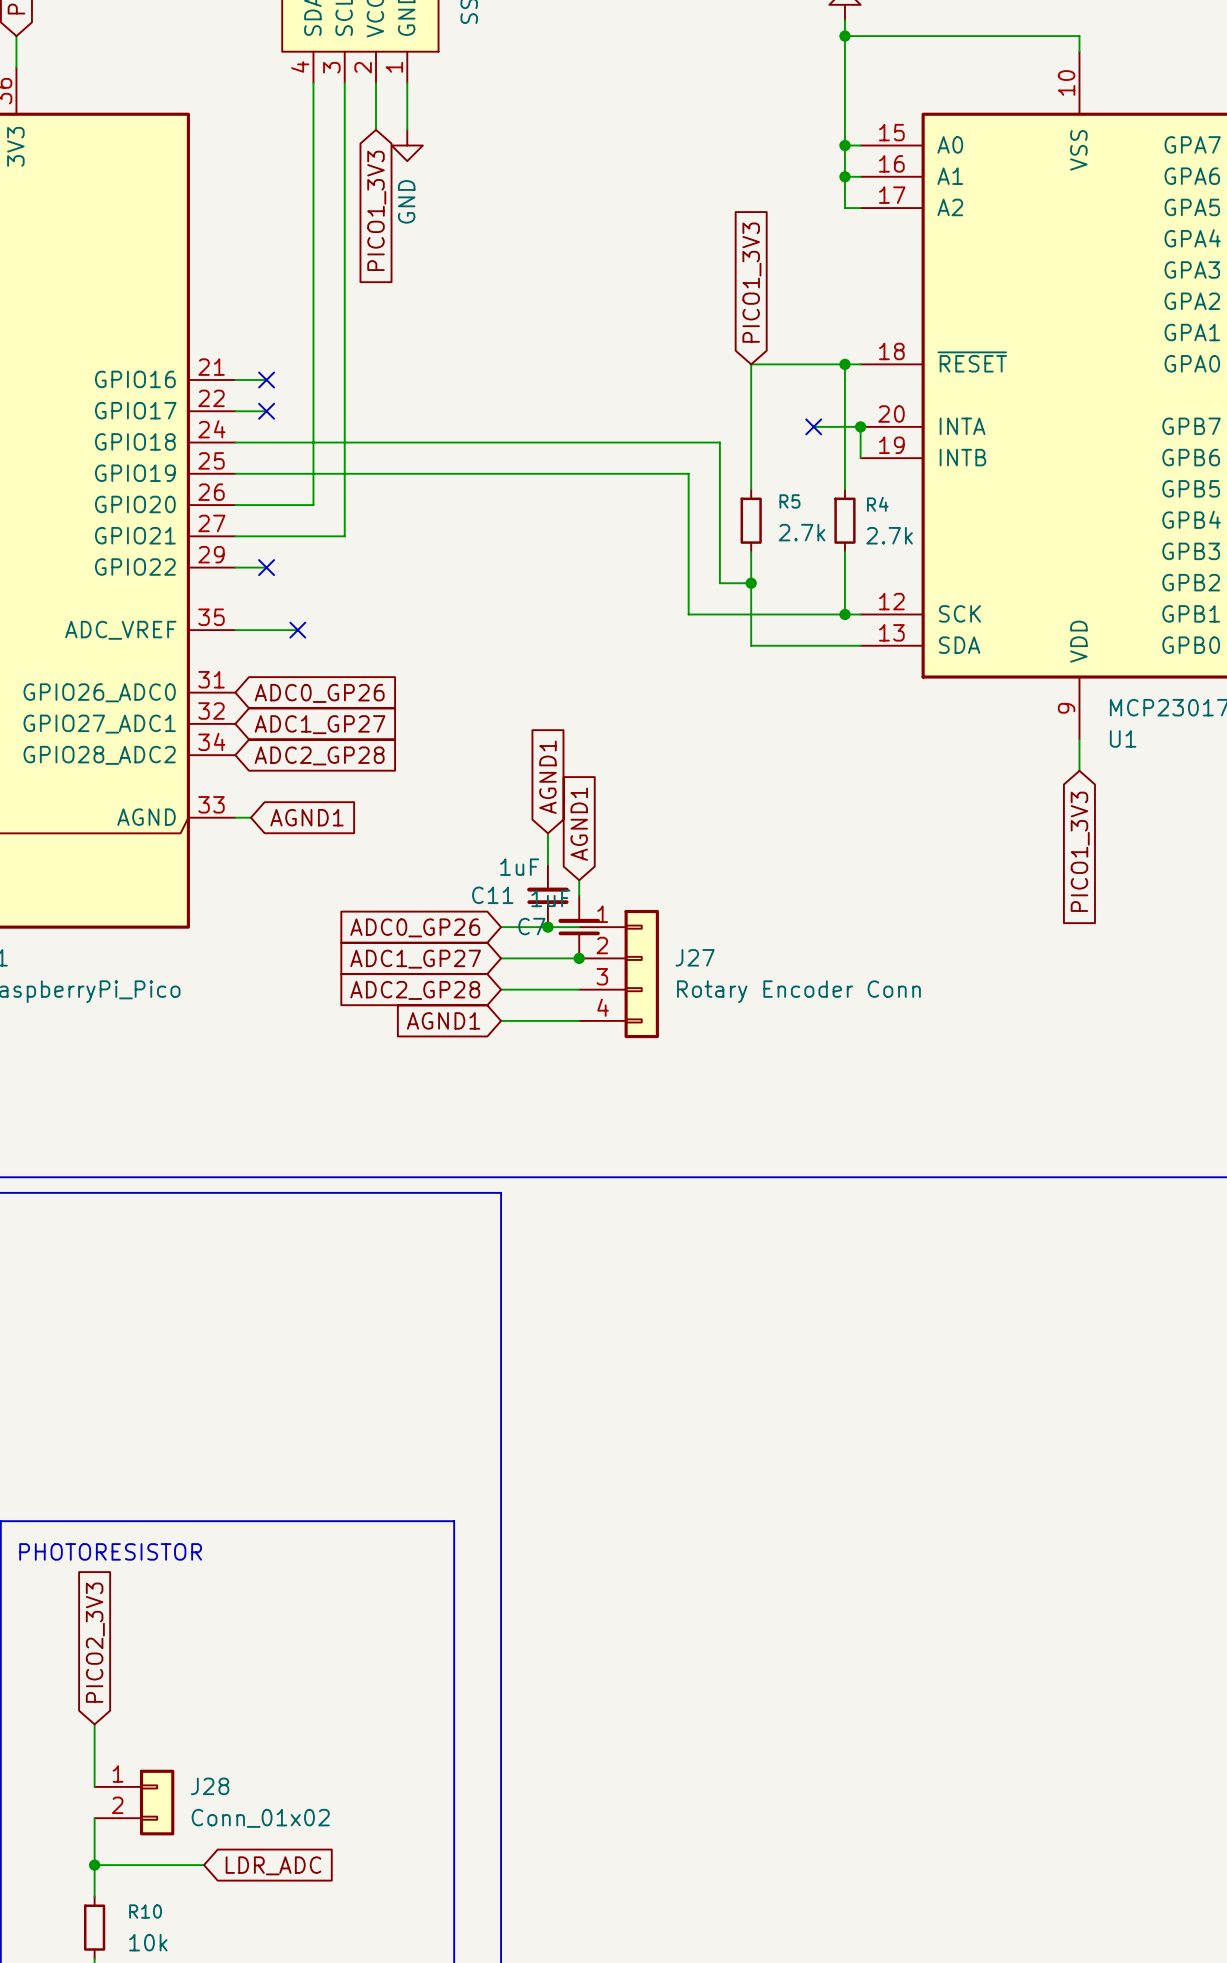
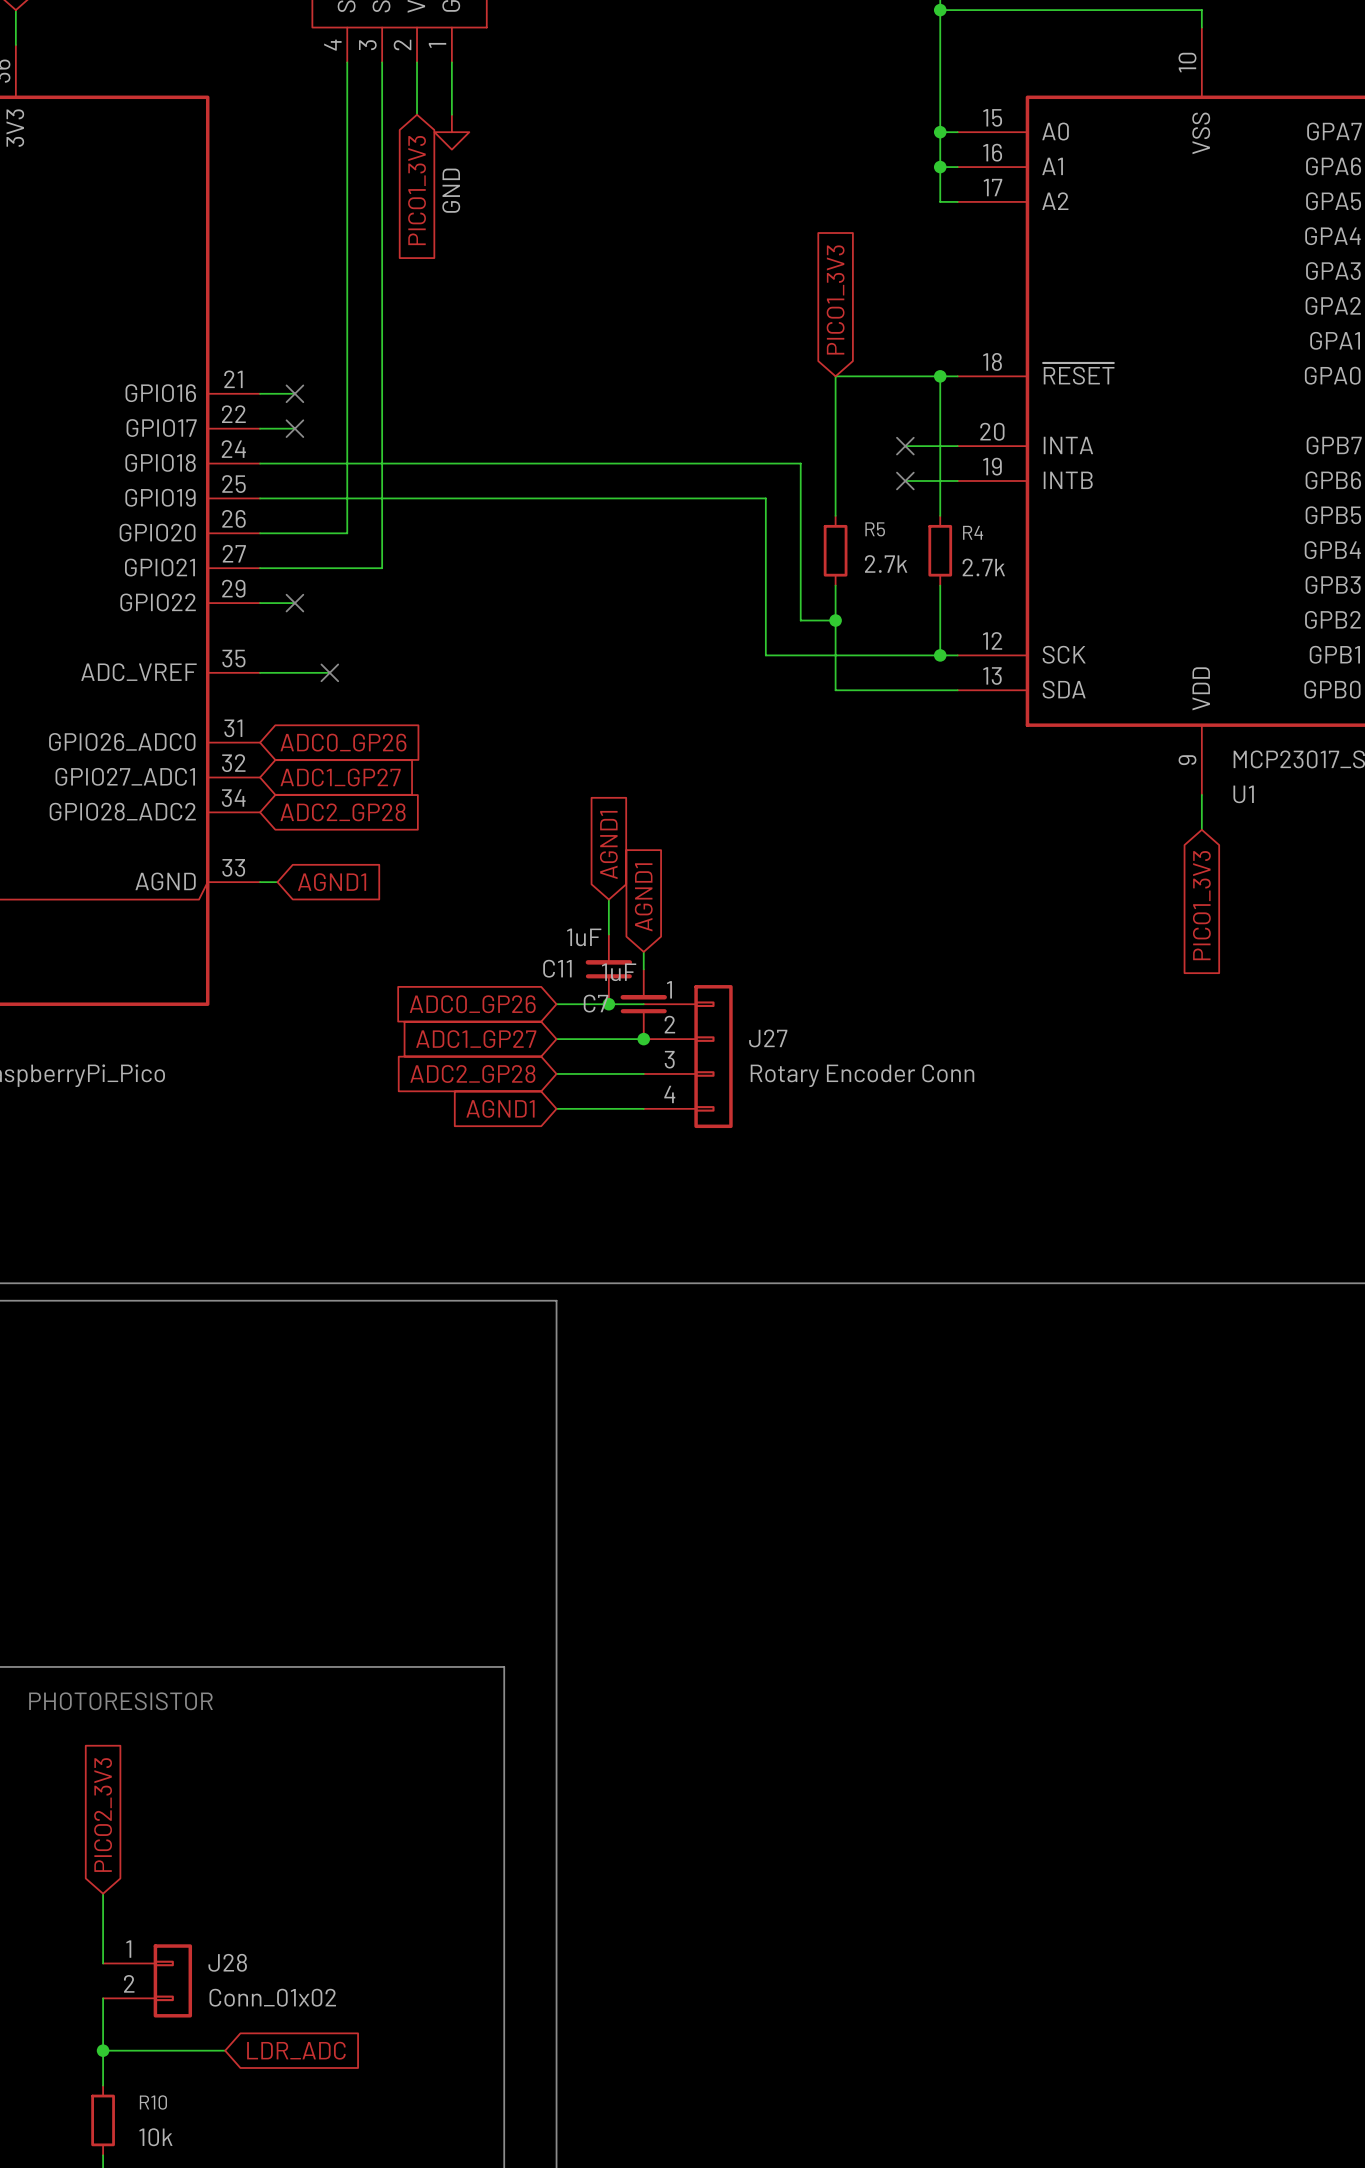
wire: (860, 426) (860, 458) -> (905, 480) (957, 480)
junction: (860, 426) -> none
no-connect mark: none -> (905, 480)

